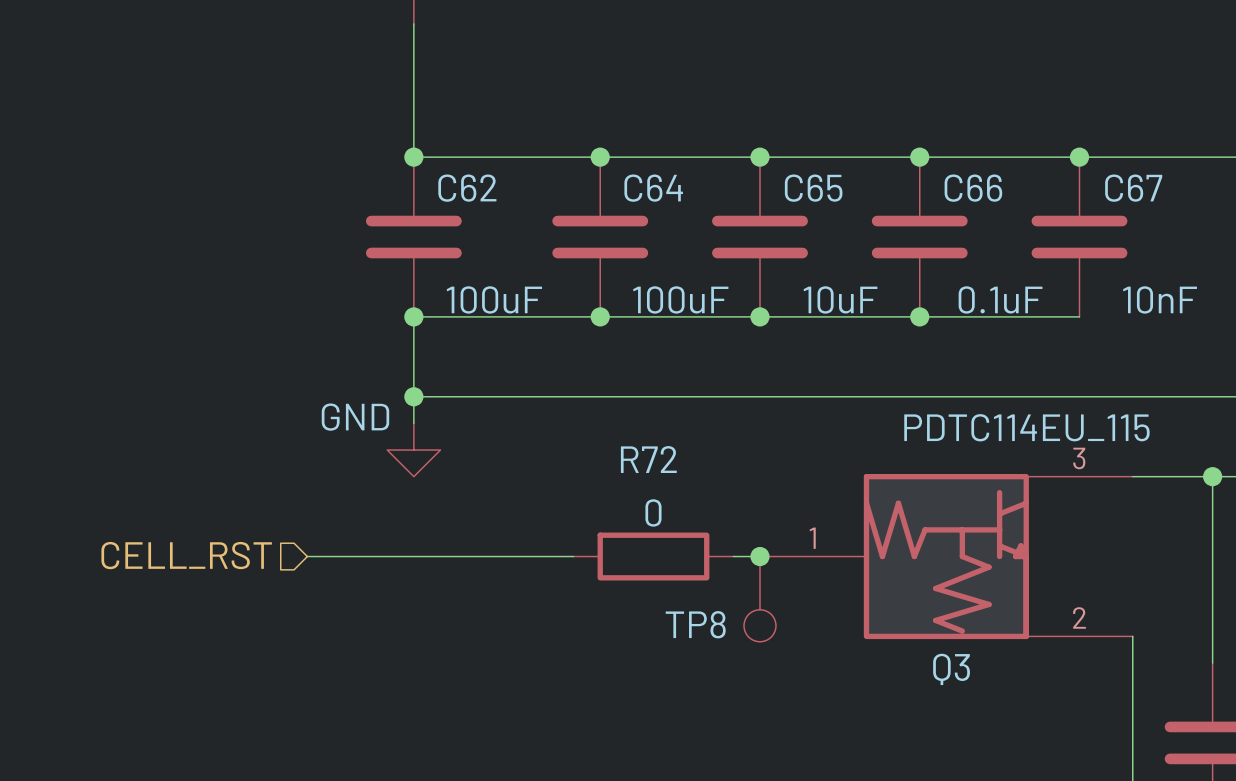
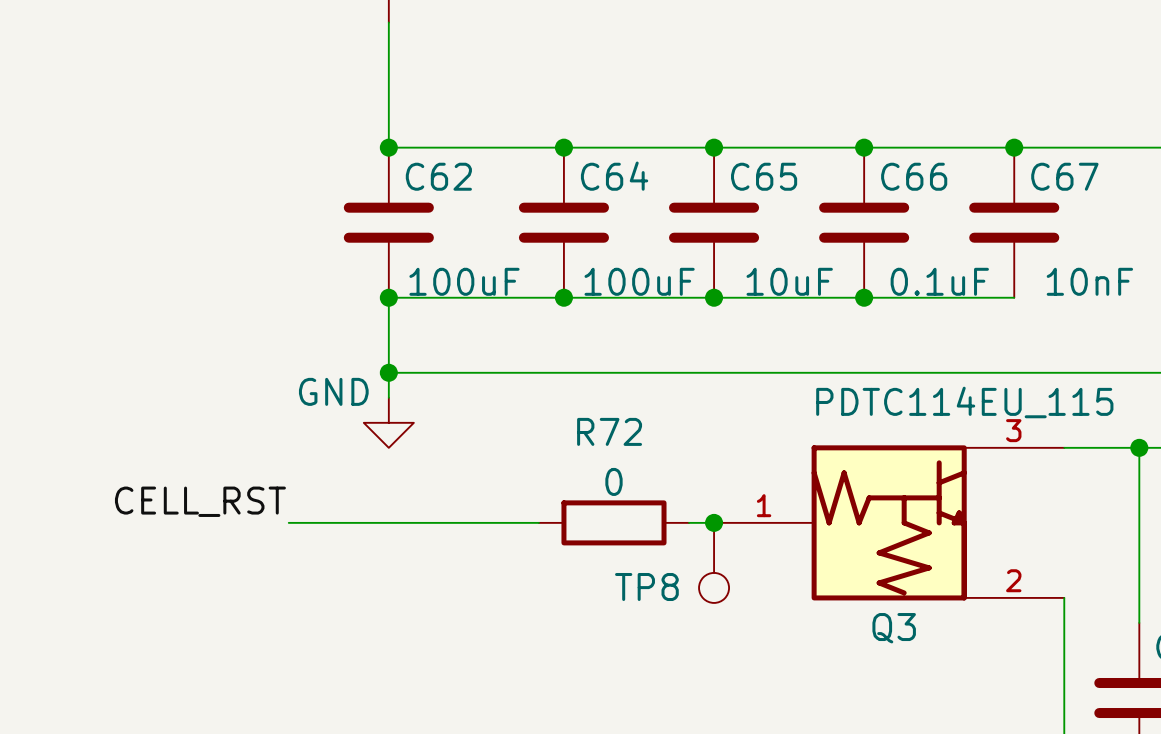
label: none -> CELL_RST (200, 501)
hierarchical label: CELL_RST (186, 555) -> none

